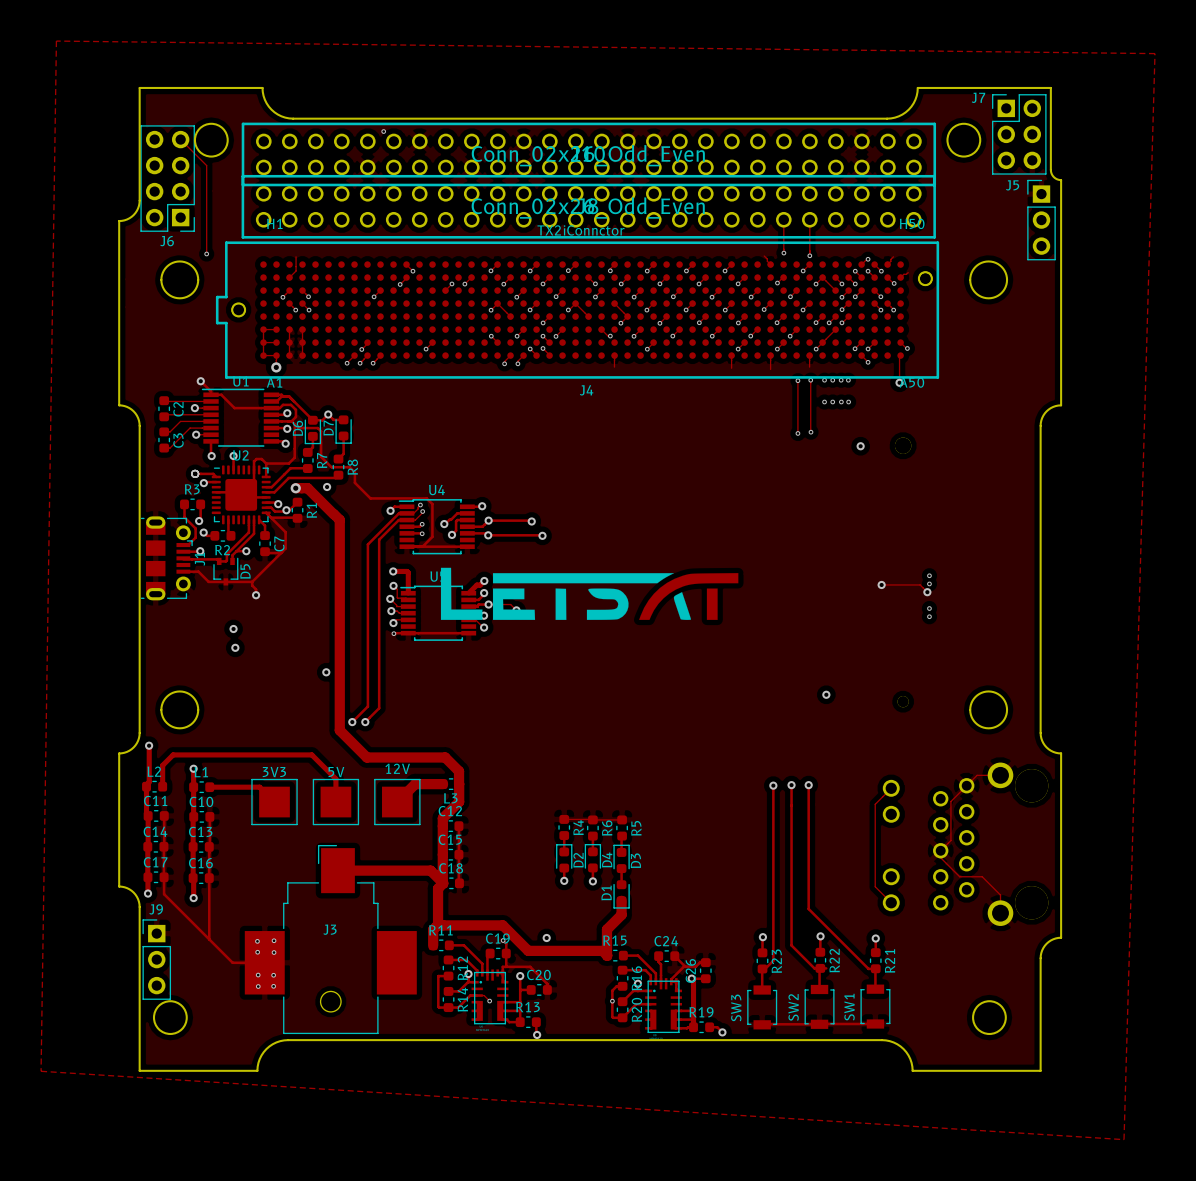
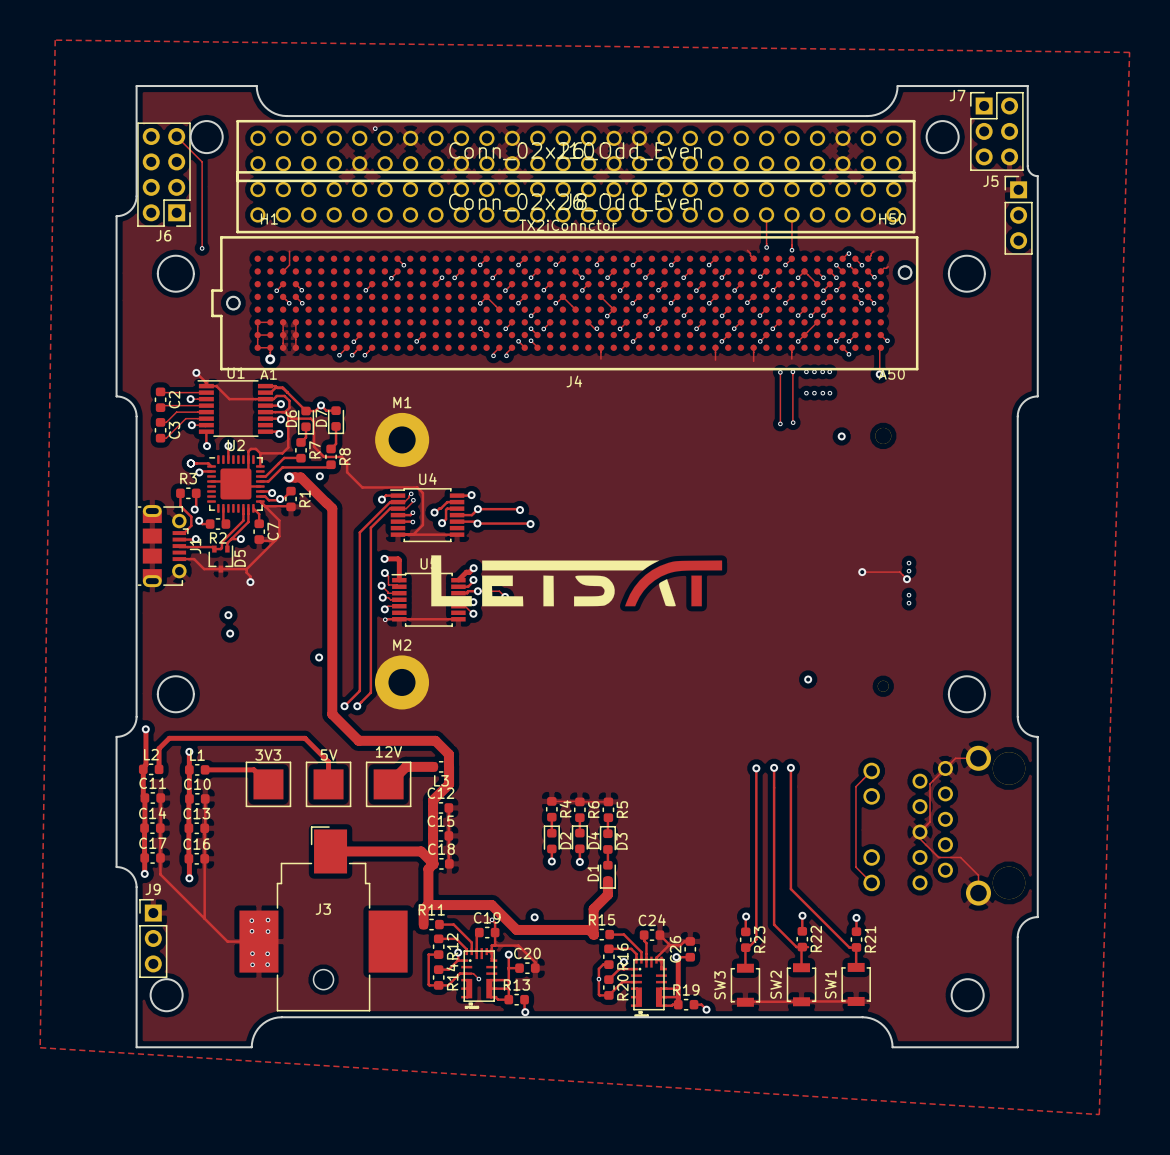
M1: none -> (402, 439)
M2: none -> (401, 682)

